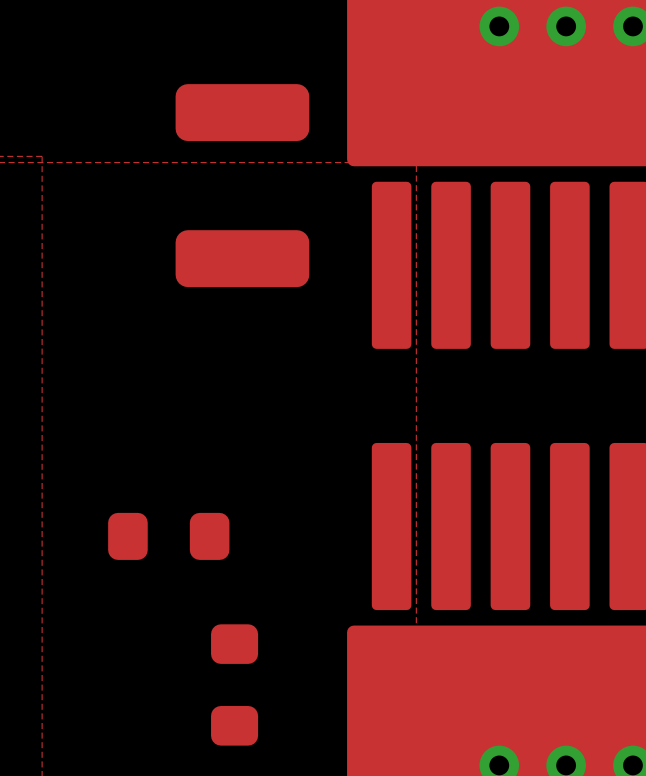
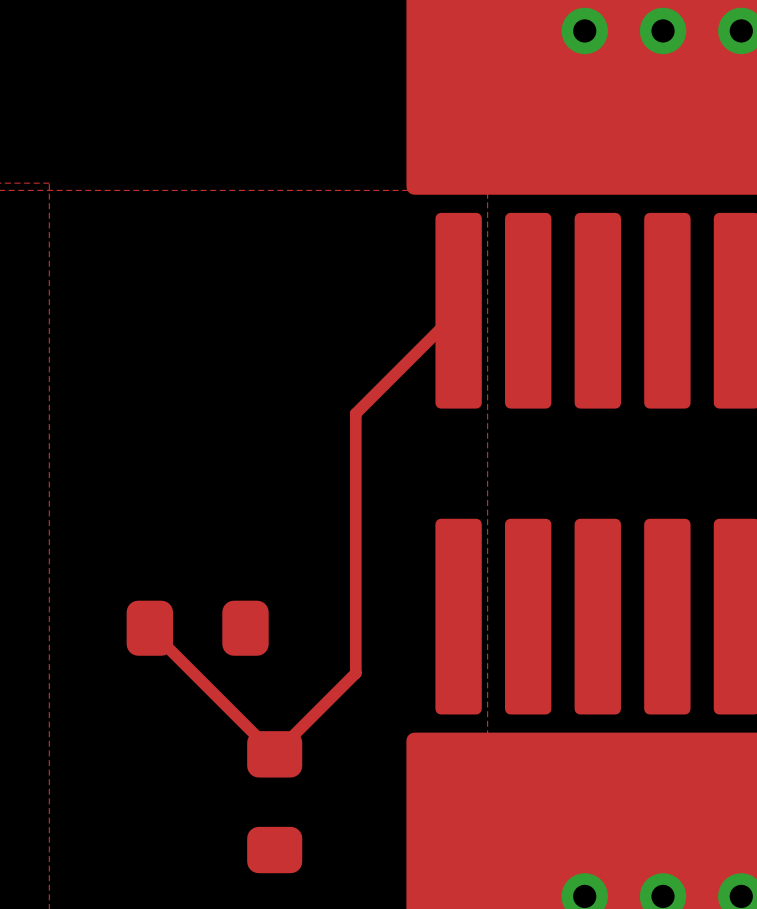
part: (242, 185) -> none
top track: none -> (458, 310) (355, 413) (355, 673) (274, 754) (149, 628)

